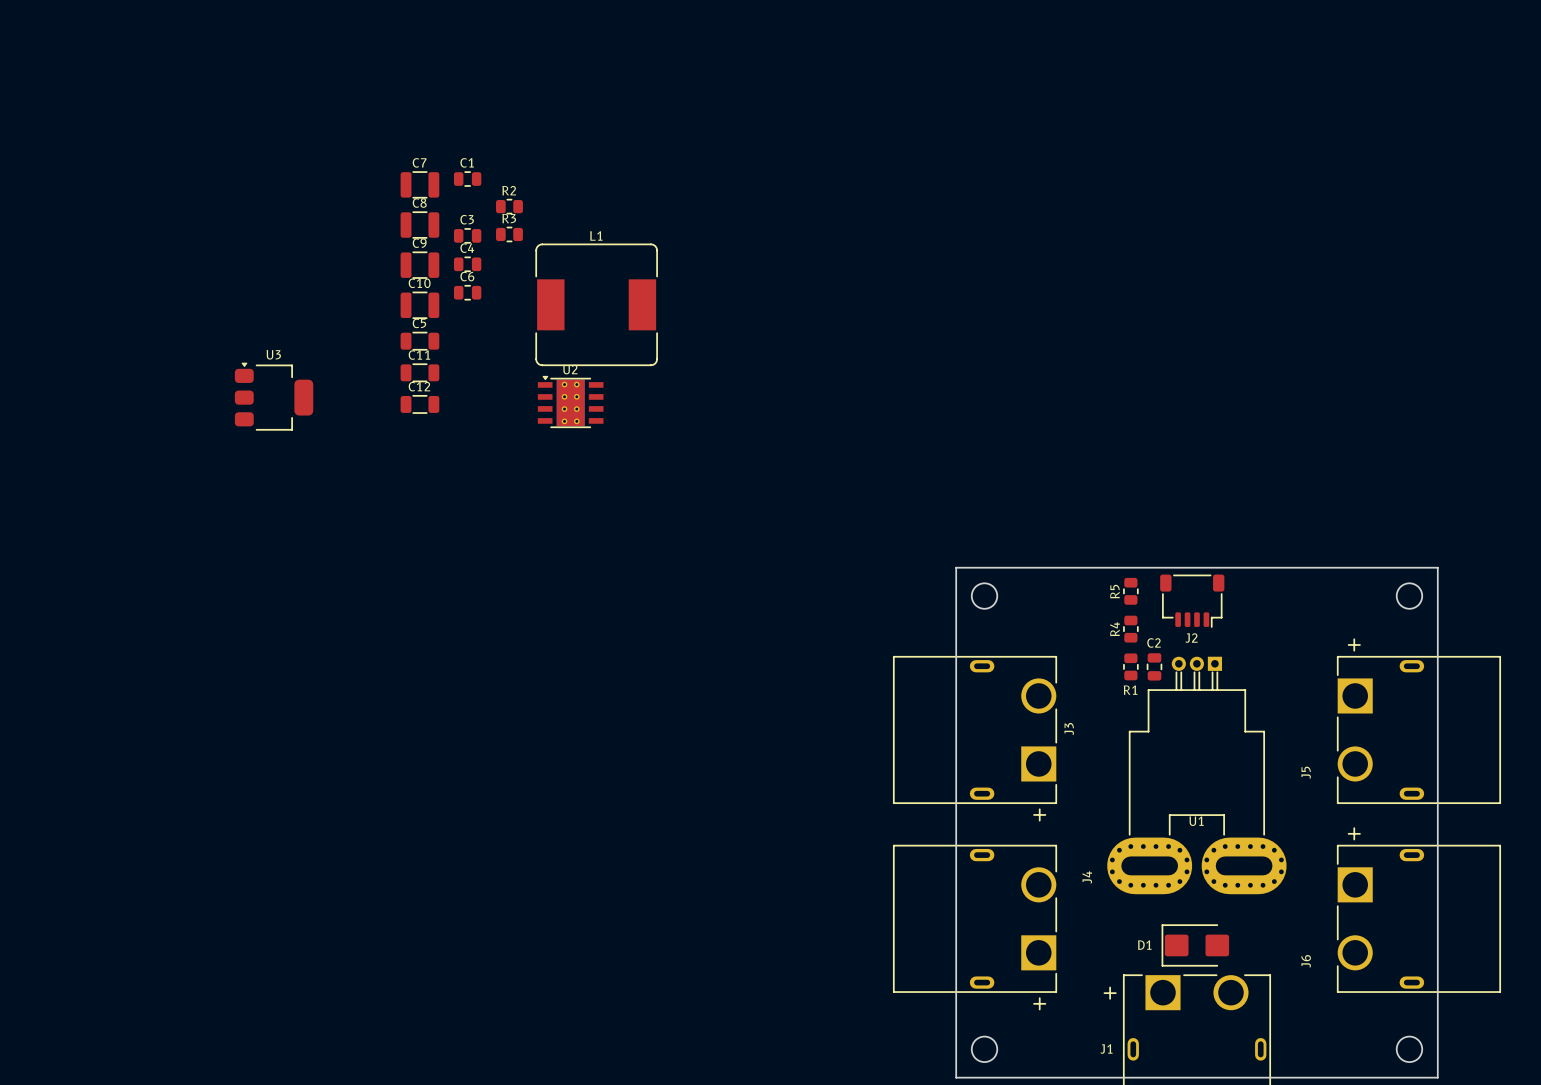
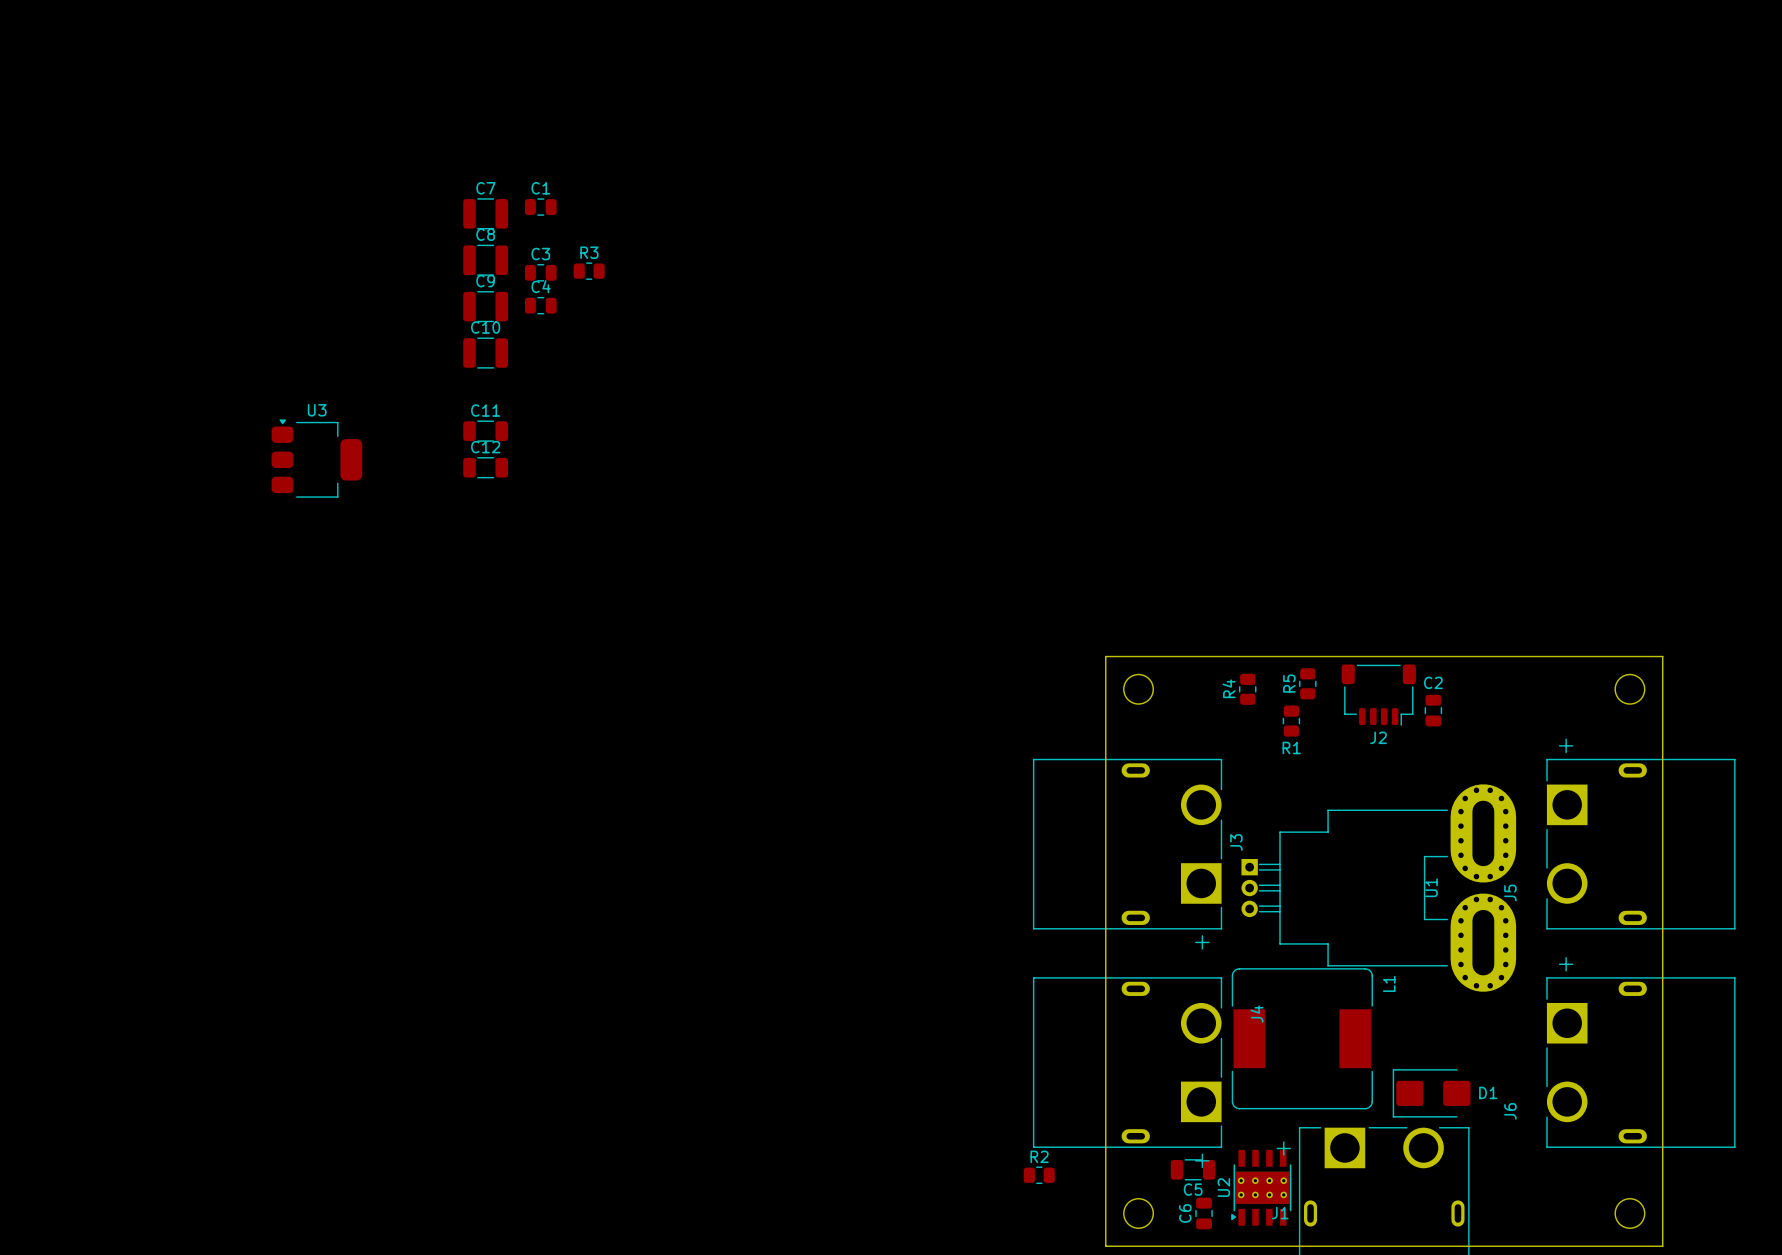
R2 position: (509, 206) -> (1039, 1175)
L1 name rotation: 0° (596, 236) -> 90° counterclockwise (1389, 983)
L1 name position: L1 (596, 236) -> L1 (1389, 983)
C6 name position: C6 (467, 276) -> C6 (1185, 1213)
C6 rotation: 0° (467, 292) -> 90° clockwise (1204, 1213)
C6 position: (467, 292) -> (1204, 1213)
L1 position: (596, 304) -> (1302, 1038)
C5 name position: C5 (419, 323) -> C5 (1193, 1189)
C5 position: (419, 341) -> (1193, 1169)
U2 rotation: 0° (570, 401) -> 90° counterclockwise (1261, 1187)
U2 position: (570, 401) -> (1261, 1187)
R4 position: (1130, 629) -> (1247, 689)
R1 position: (1130, 666) -> (1291, 721)
C2 position: (1154, 666) -> (1433, 710)
U1 rotation: 0° (1196, 775) -> 90° counterclockwise (1378, 888)
D1 name position: D1 (1144, 945) -> D1 (1488, 1092)
D1 position: (1195, 945) -> (1431, 1093)

